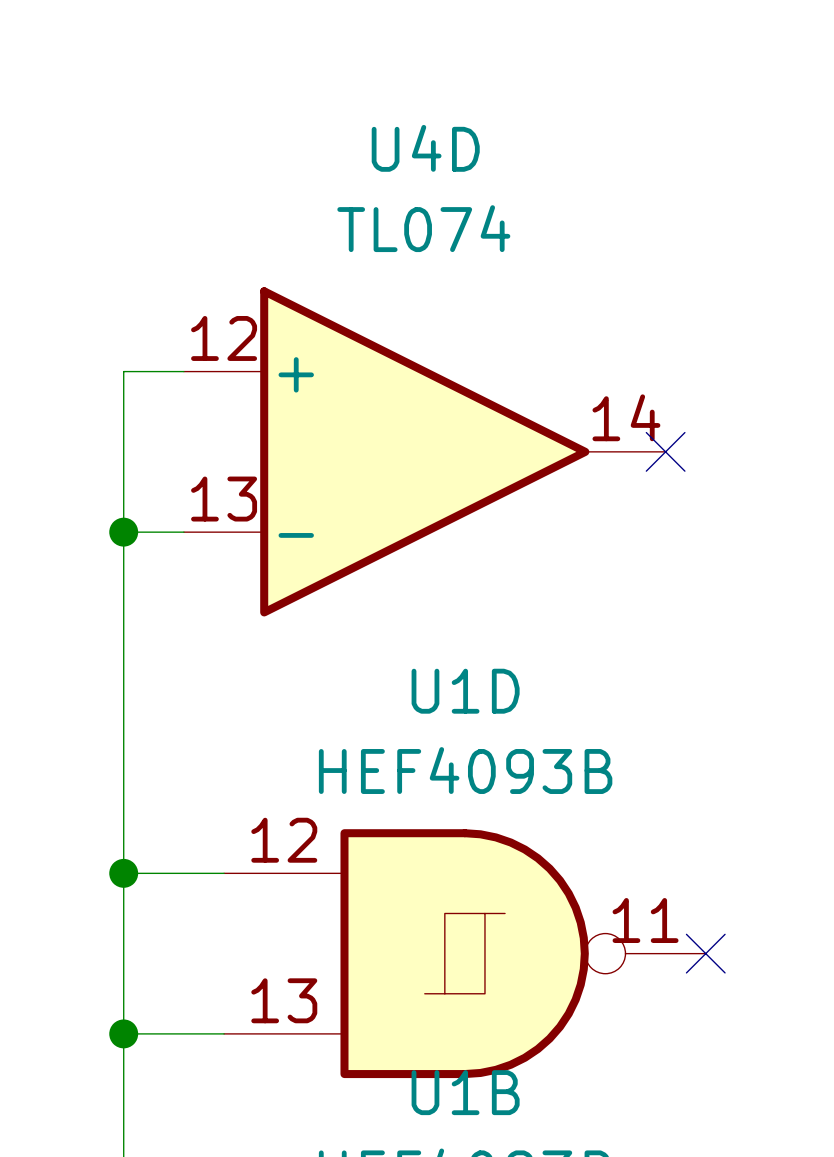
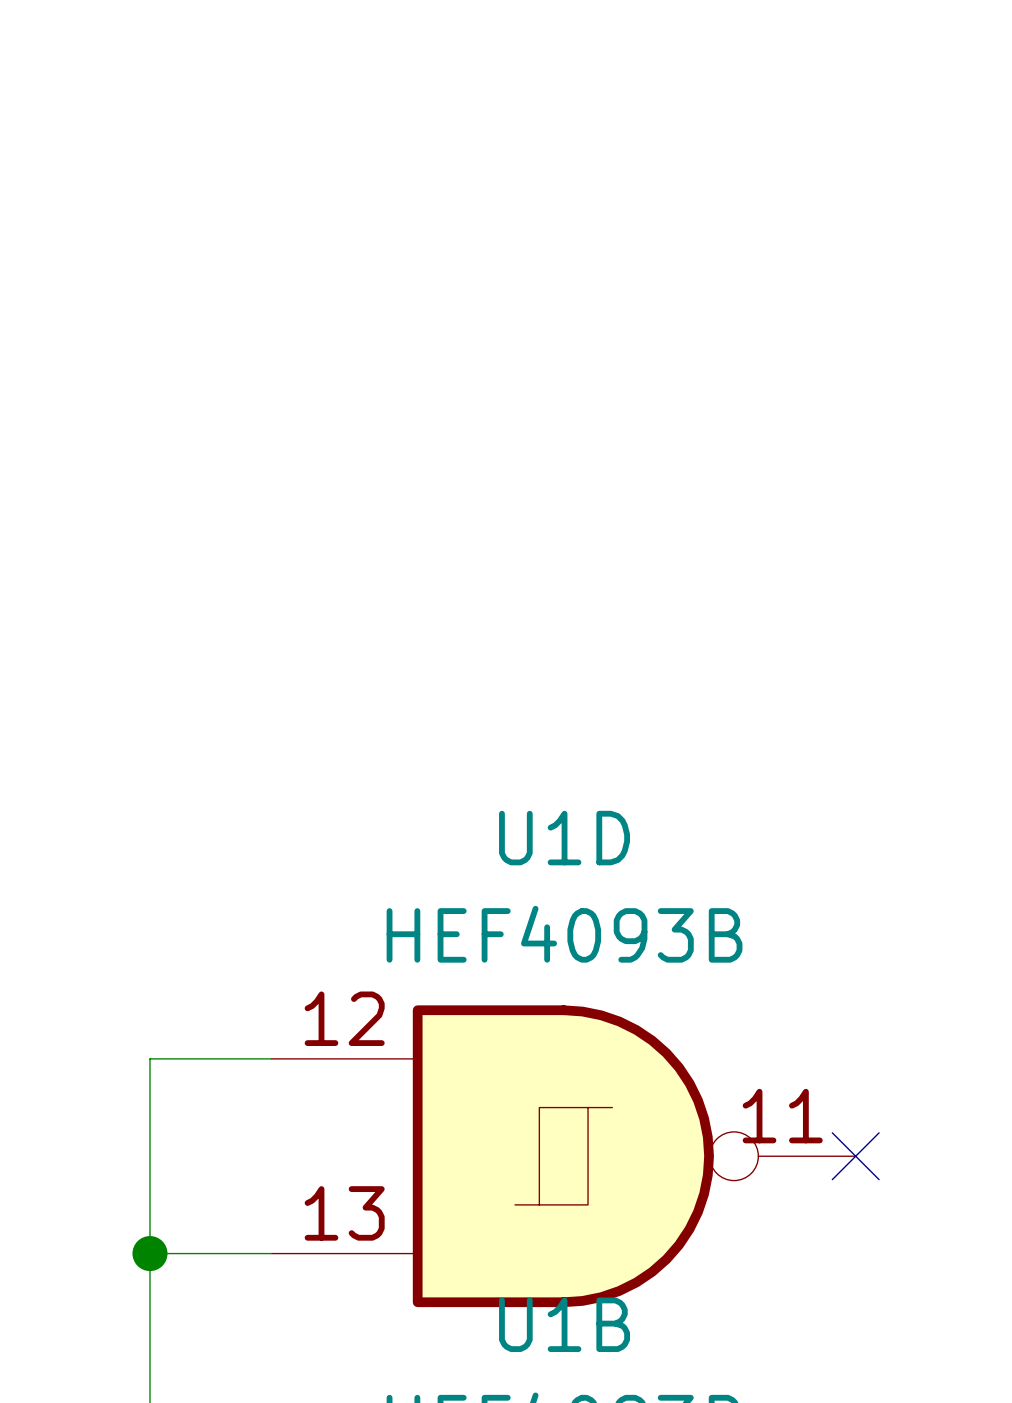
wire: (183, 371) (123, 371) (123, 873) -> none
U4D: TL074 (424, 451) -> none
no-connect mark: (665, 451) -> none
wire: (123, 532) (183, 532) -> none
junction: (123, 532) -> none
junction: (123, 873) -> none

